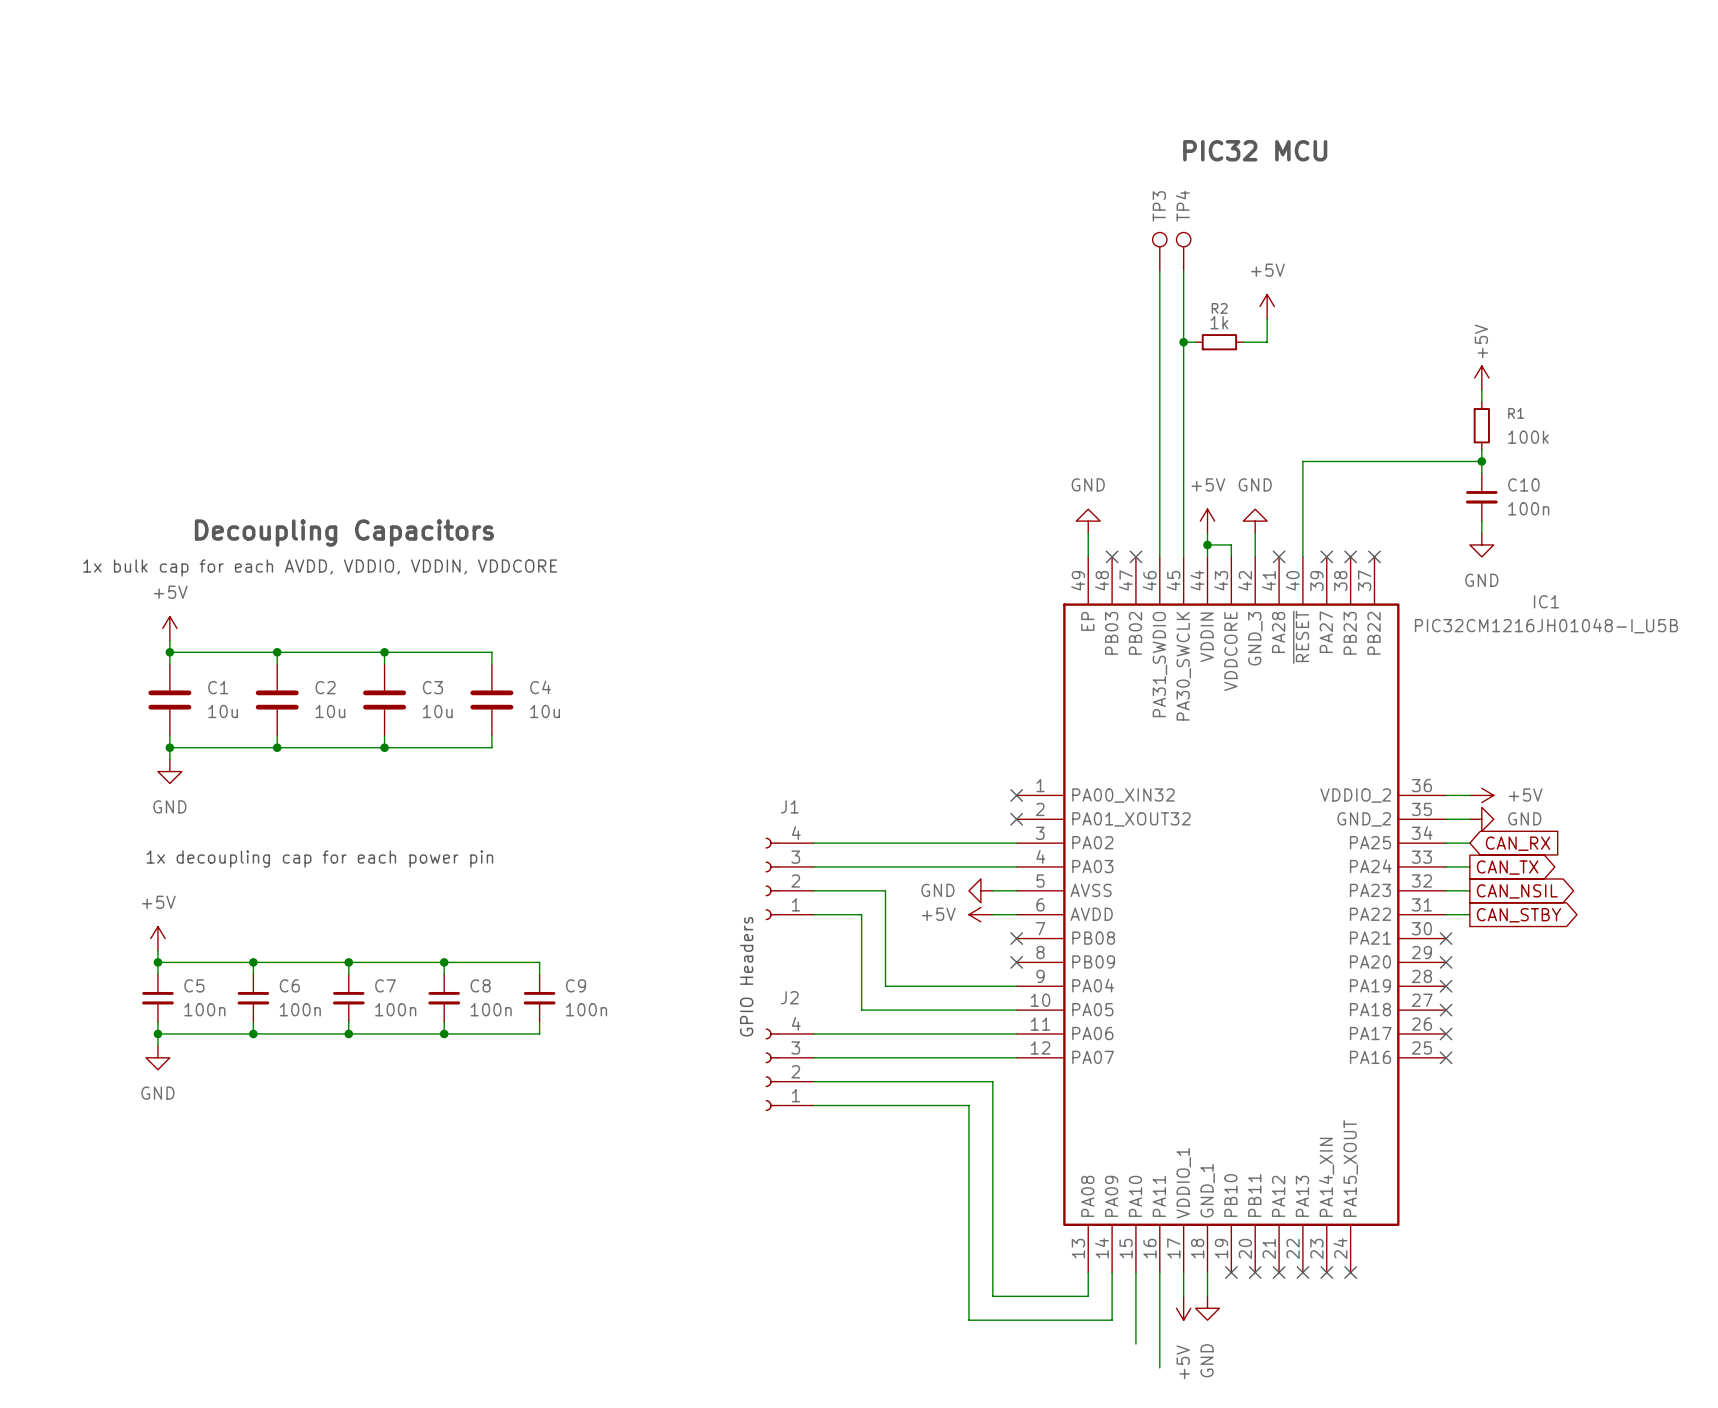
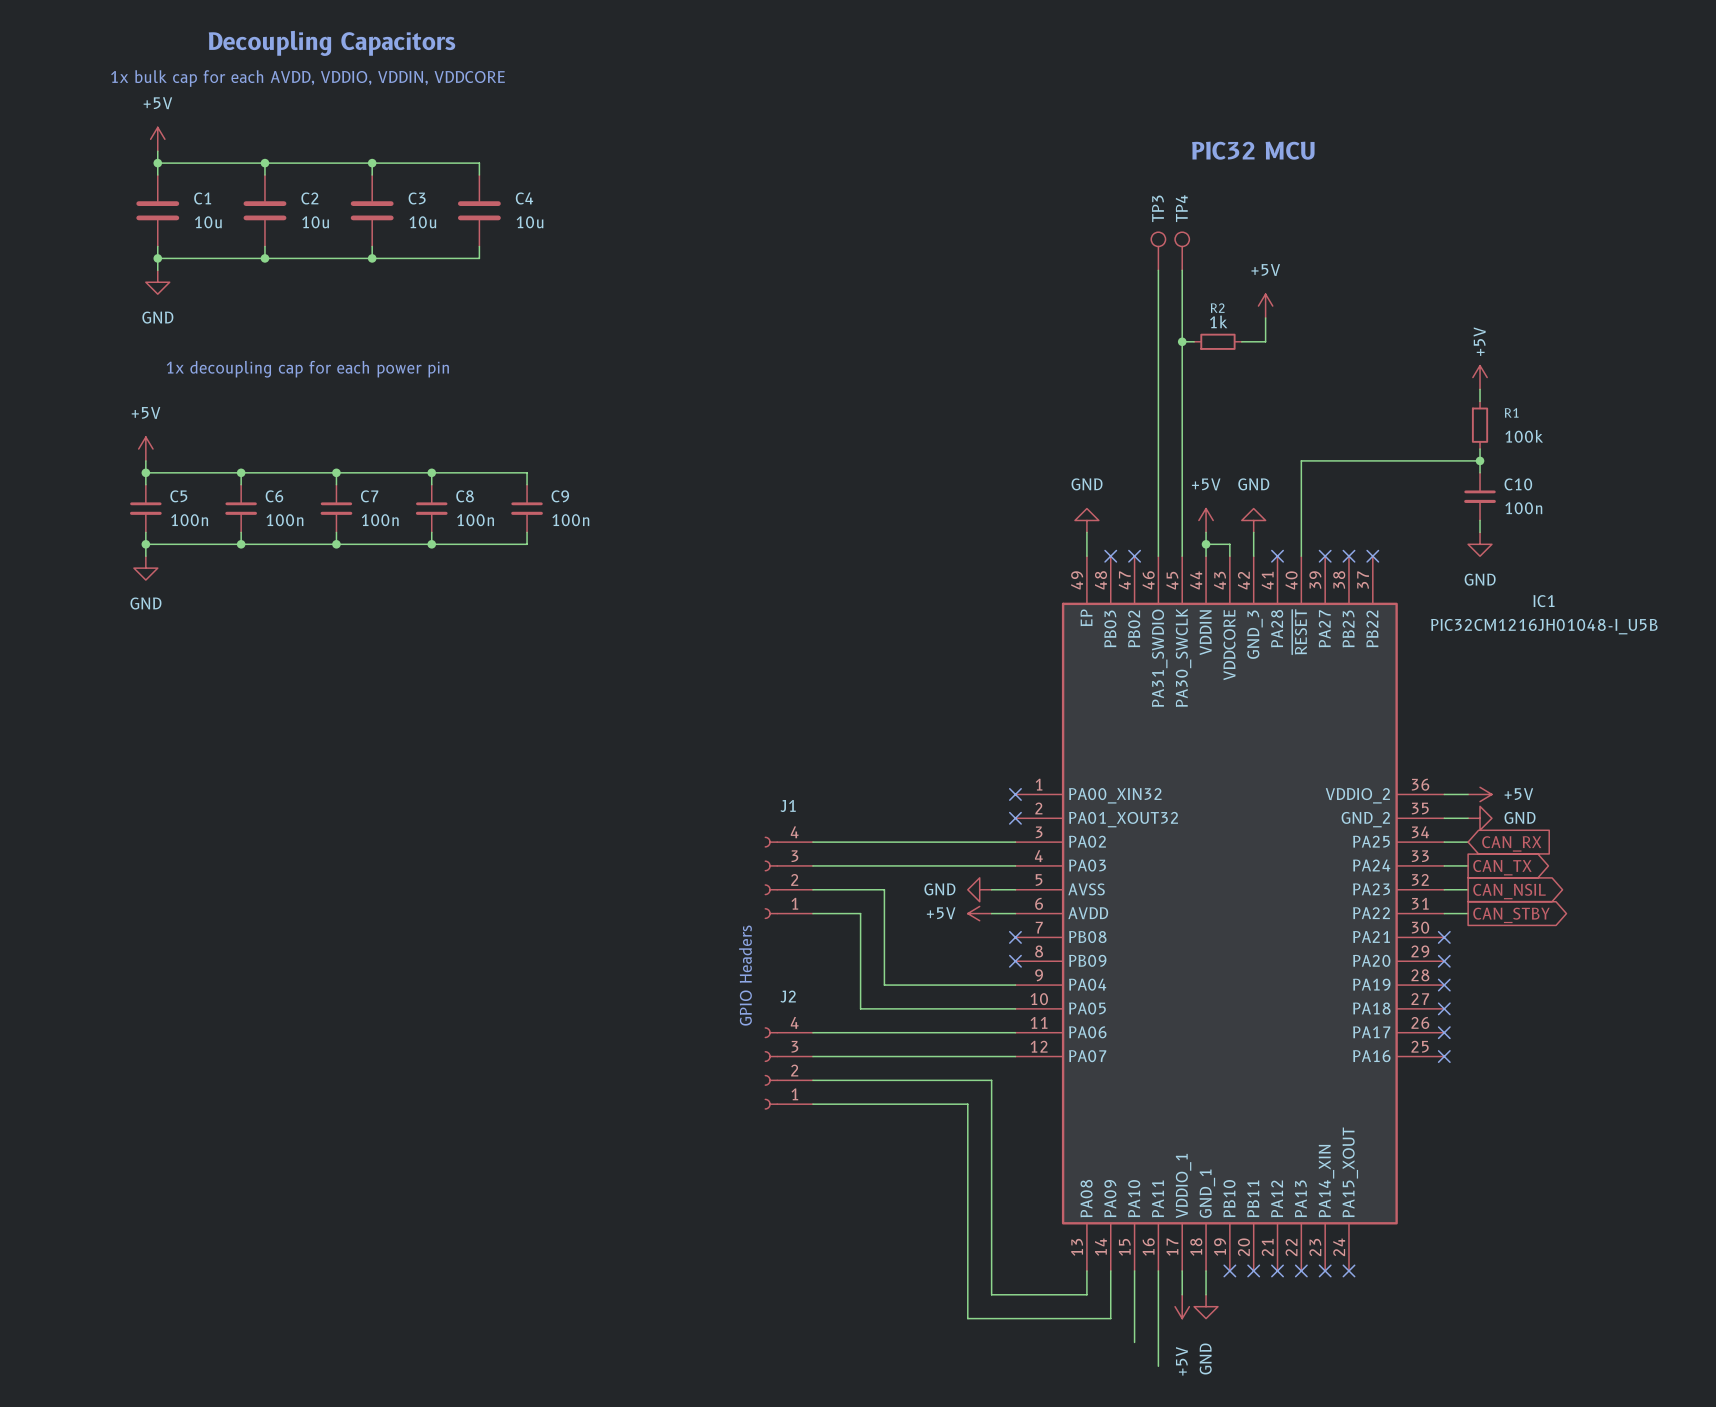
text: none -> Decoupling Capacitors (332, 43)
text: none -> 1x bulk cap for each AVDD, VDDIO, VDDIN, VDDCORE (308, 78)
power symbol: none -> +5V (157, 139)
wire: none -> (157, 151) (157, 175)
wire: none -> (157, 163) (479, 163) (479, 175)
junction: none -> (157, 163)
wire: none -> (264, 163) (264, 175)
junction: none -> (264, 163)
wire: none -> (372, 163) (372, 175)
junction: none -> (372, 163)
wire: none -> (157, 246) (157, 270)
wire: none -> (264, 246) (264, 258)
wire: none -> (372, 246) (372, 258)
wire: none -> (479, 246) (479, 258) (157, 258)
junction: none -> (157, 258)
junction: none -> (264, 258)
junction: none -> (372, 258)
power symbol: none -> GND (157, 282)
text: none -> 1x decoupling cap for each power pin (307, 369)
wire: none -> (145, 460) (145, 484)
wire: none -> (145, 472) (527, 472) (527, 484)
junction: none -> (145, 472)
wire: none -> (241, 472) (241, 484)
junction: none -> (241, 472)
wire: none -> (336, 472) (336, 484)
junction: none -> (336, 472)
wire: none -> (431, 472) (431, 484)
junction: none -> (431, 472)
text: Decoupling Capacitors (344, 533) -> none
wire: none -> (527, 532) (527, 544) (145, 544)
junction: none -> (145, 544)
junction: none -> (241, 544)
junction: none -> (336, 544)
junction: none -> (431, 544)
text: 1x bulk cap for each AVDD, VDDIO, VDDIN, VDDCORE (320, 568) -> none
power symbol position: +5V (169, 628) -> +5V (145, 449)
wire: (169, 640) (169, 664) -> (145, 532) (145, 556)
wire: (169, 652) (491, 652) (491, 664) -> none
junction: (169, 652) -> none
wire: (277, 652) (277, 664) -> (241, 532) (241, 544)
junction: (277, 652) -> none
wire: (384, 652) (384, 664) -> (431, 532) (431, 544)
junction: (384, 652) -> none
C1 position: (169, 700) -> (157, 210)
C2 position: (277, 700) -> (264, 210)
C3 position: (384, 700) -> (372, 210)
C4 position: (491, 700) -> (479, 210)
wire: (169, 735) (169, 759) -> none
wire: (277, 735) (277, 747) -> none
wire: (384, 735) (384, 747) -> (336, 532) (336, 544)
wire: (491, 735) (491, 747) (169, 747) -> none
junction: (169, 747) -> none
junction: (277, 747) -> none
junction: (384, 747) -> none
power symbol position: GND (169, 771) -> GND (145, 568)
text: 1x decoupling cap for each power pin (319, 859) -> none
power symbol: +5V (157, 938) -> none
wire: (157, 950) (157, 974) -> none
wire: (157, 962) (539, 962) (539, 974) -> none
junction: (157, 962) -> none
wire: (253, 962) (253, 974) -> none
junction: (253, 962) -> none
wire: (348, 962) (348, 974) -> none
junction: (348, 962) -> none
wire: (444, 962) (444, 974) -> none
junction: (444, 962) -> none
C5 position: (157, 998) -> (145, 508)
C6 position: (253, 998) -> (241, 508)
C7 position: (348, 998) -> (336, 508)
C8 position: (444, 998) -> (431, 508)
C9 position: (539, 998) -> (527, 508)
wire: (157, 1022) (157, 1045) -> none
wire: (253, 1022) (253, 1033) -> none
wire: (348, 1022) (348, 1033) -> none
wire: (444, 1022) (444, 1033) -> none
wire: (539, 1022) (539, 1033) (157, 1033) -> none
junction: (157, 1033) -> none
junction: (253, 1033) -> none
junction: (348, 1033) -> none
junction: (444, 1033) -> none
power symbol: GND (157, 1057) -> none

